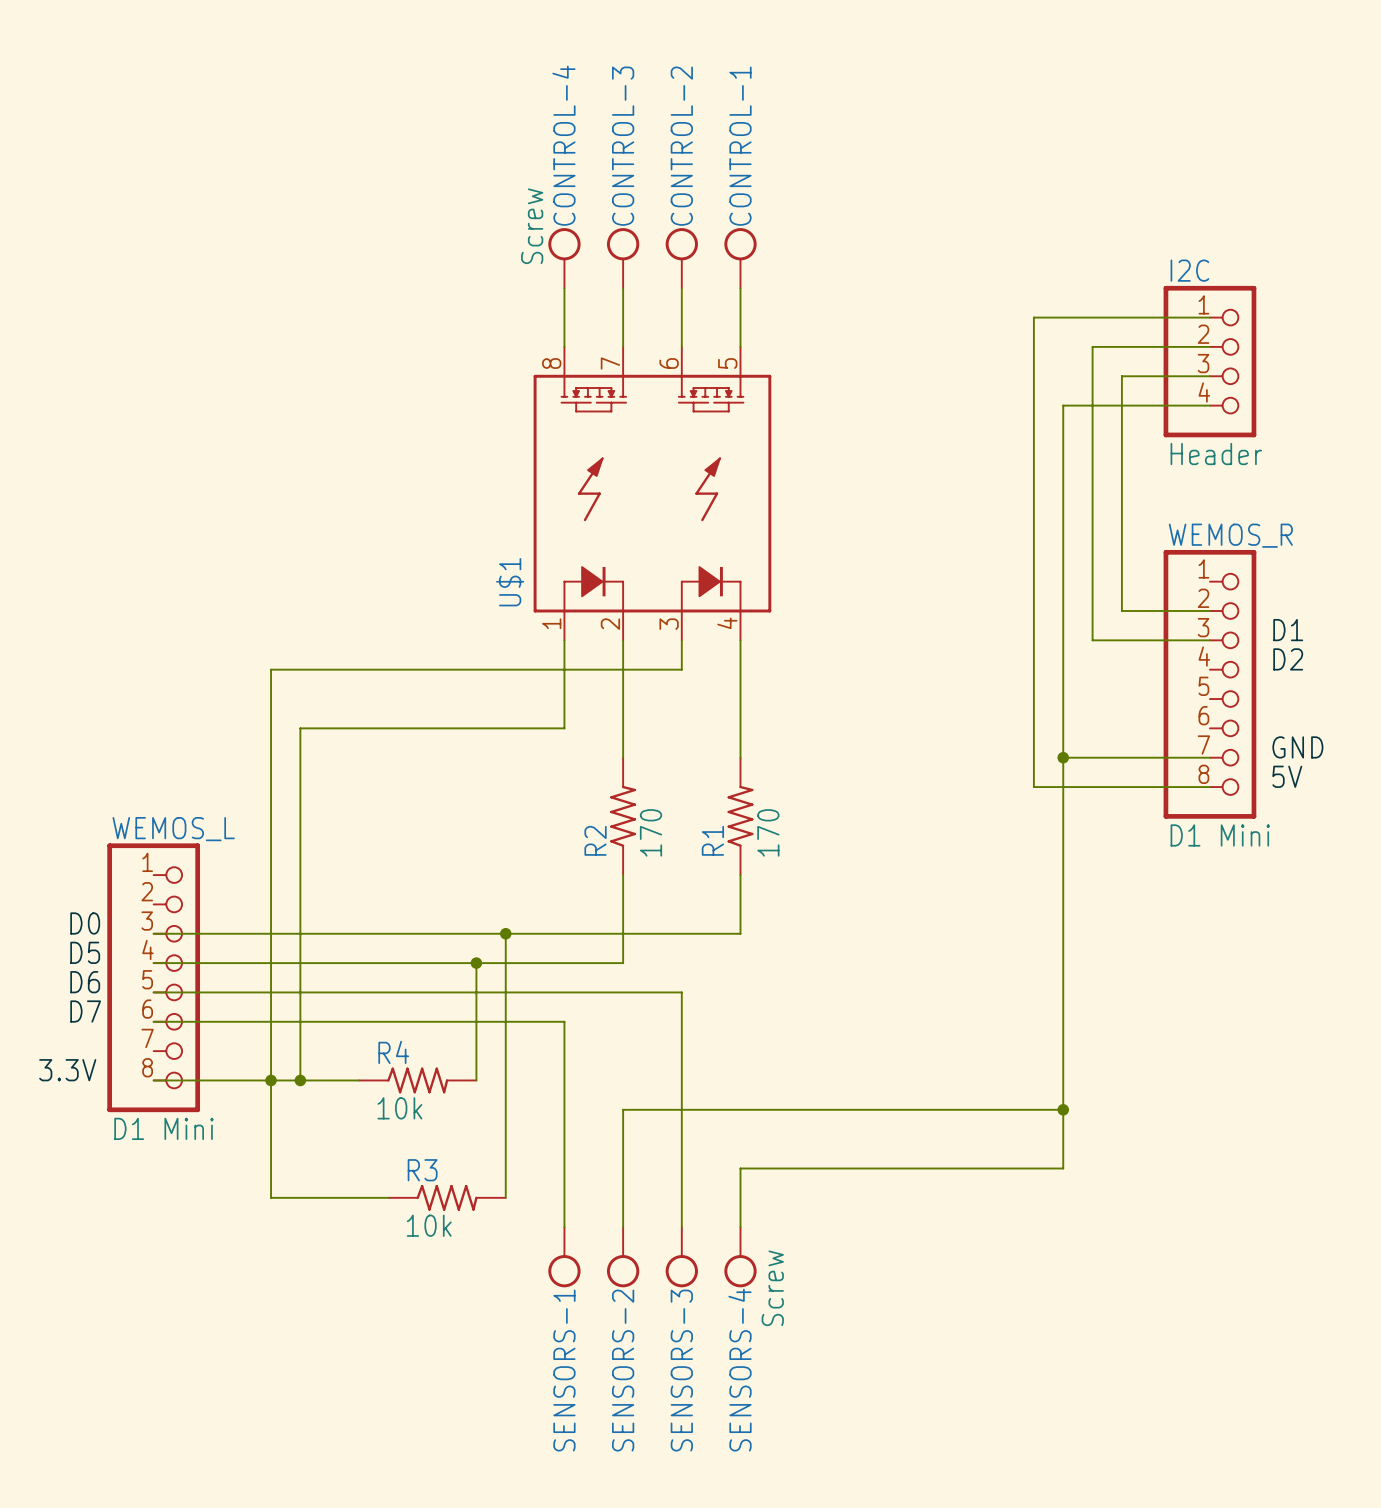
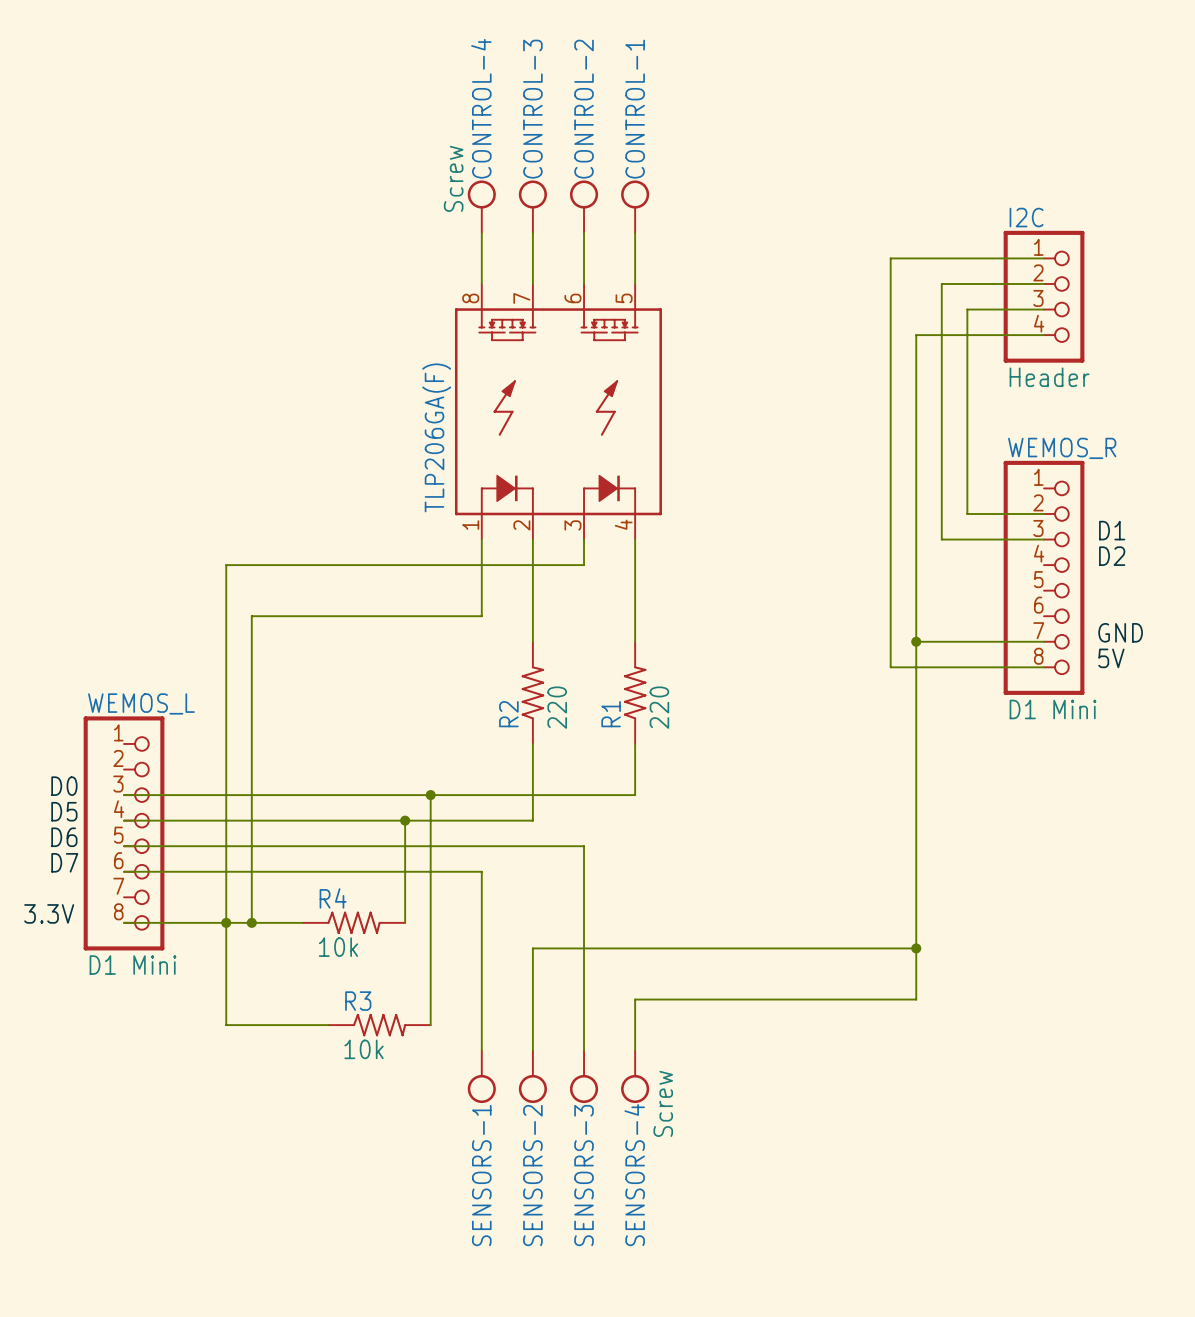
U$1 name: U$1 (510, 582) -> TLP206GA(F) (436, 437)
R2 value: 170 (650, 832) -> 220 (557, 707)
R1 value: 170 (768, 832) -> 220 (659, 707)

